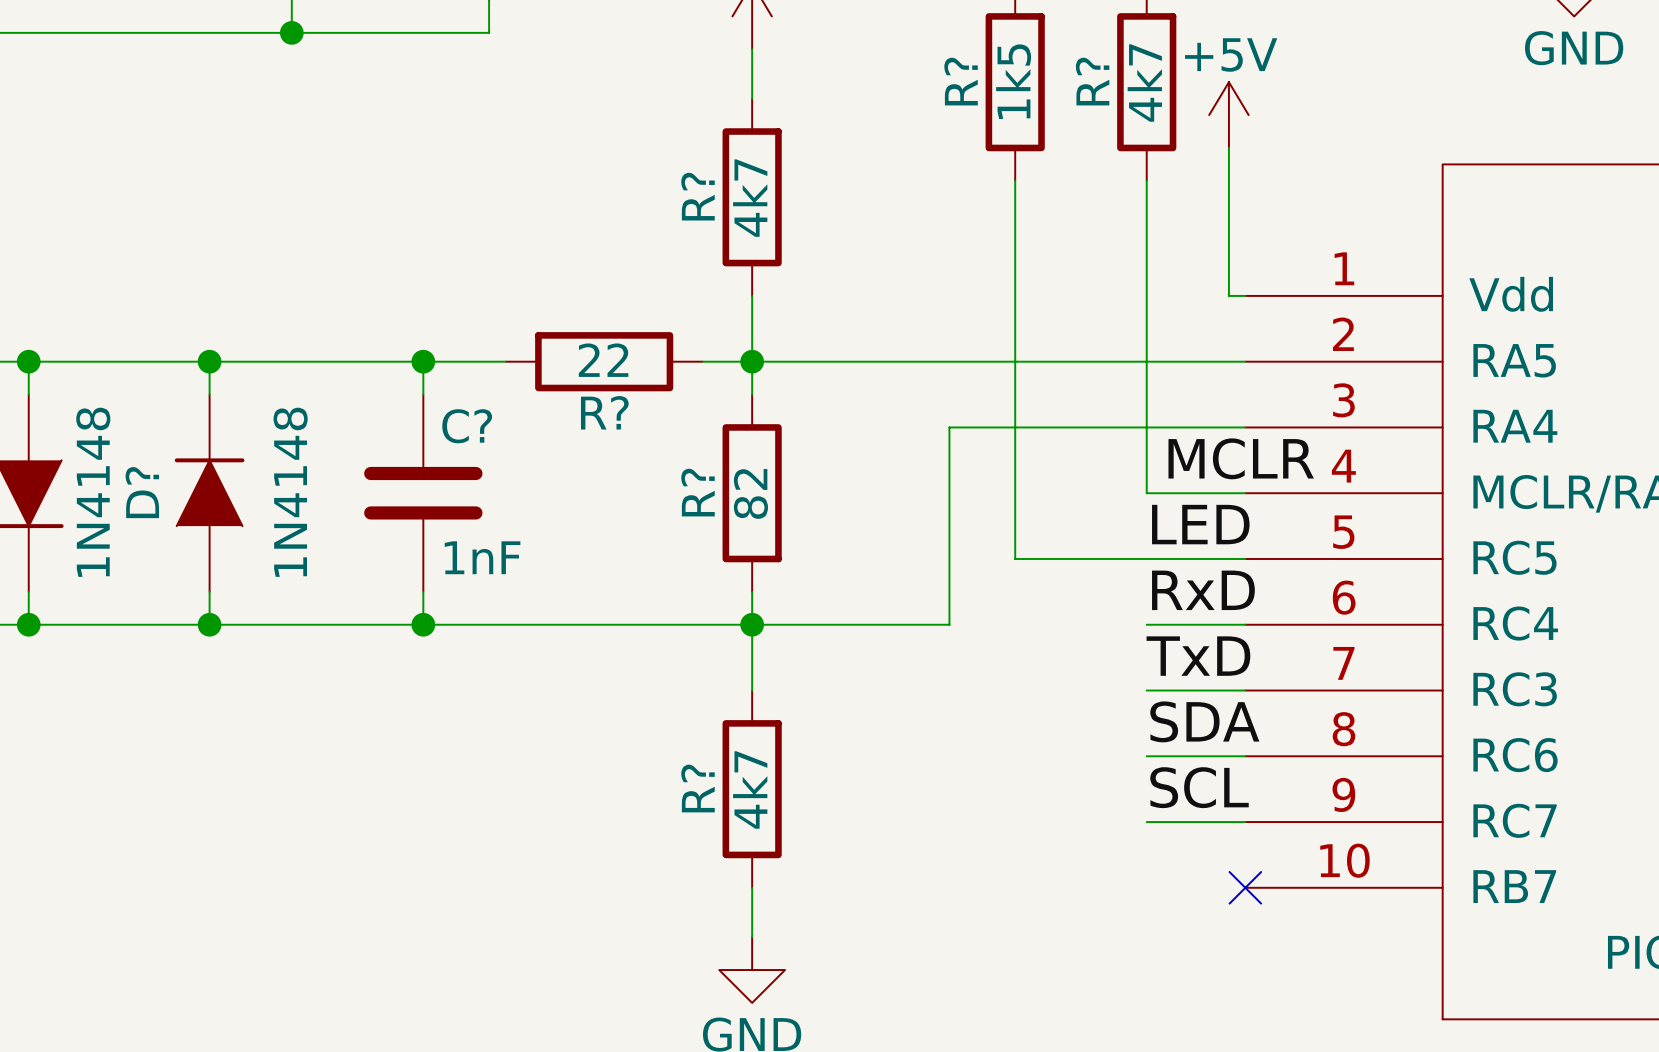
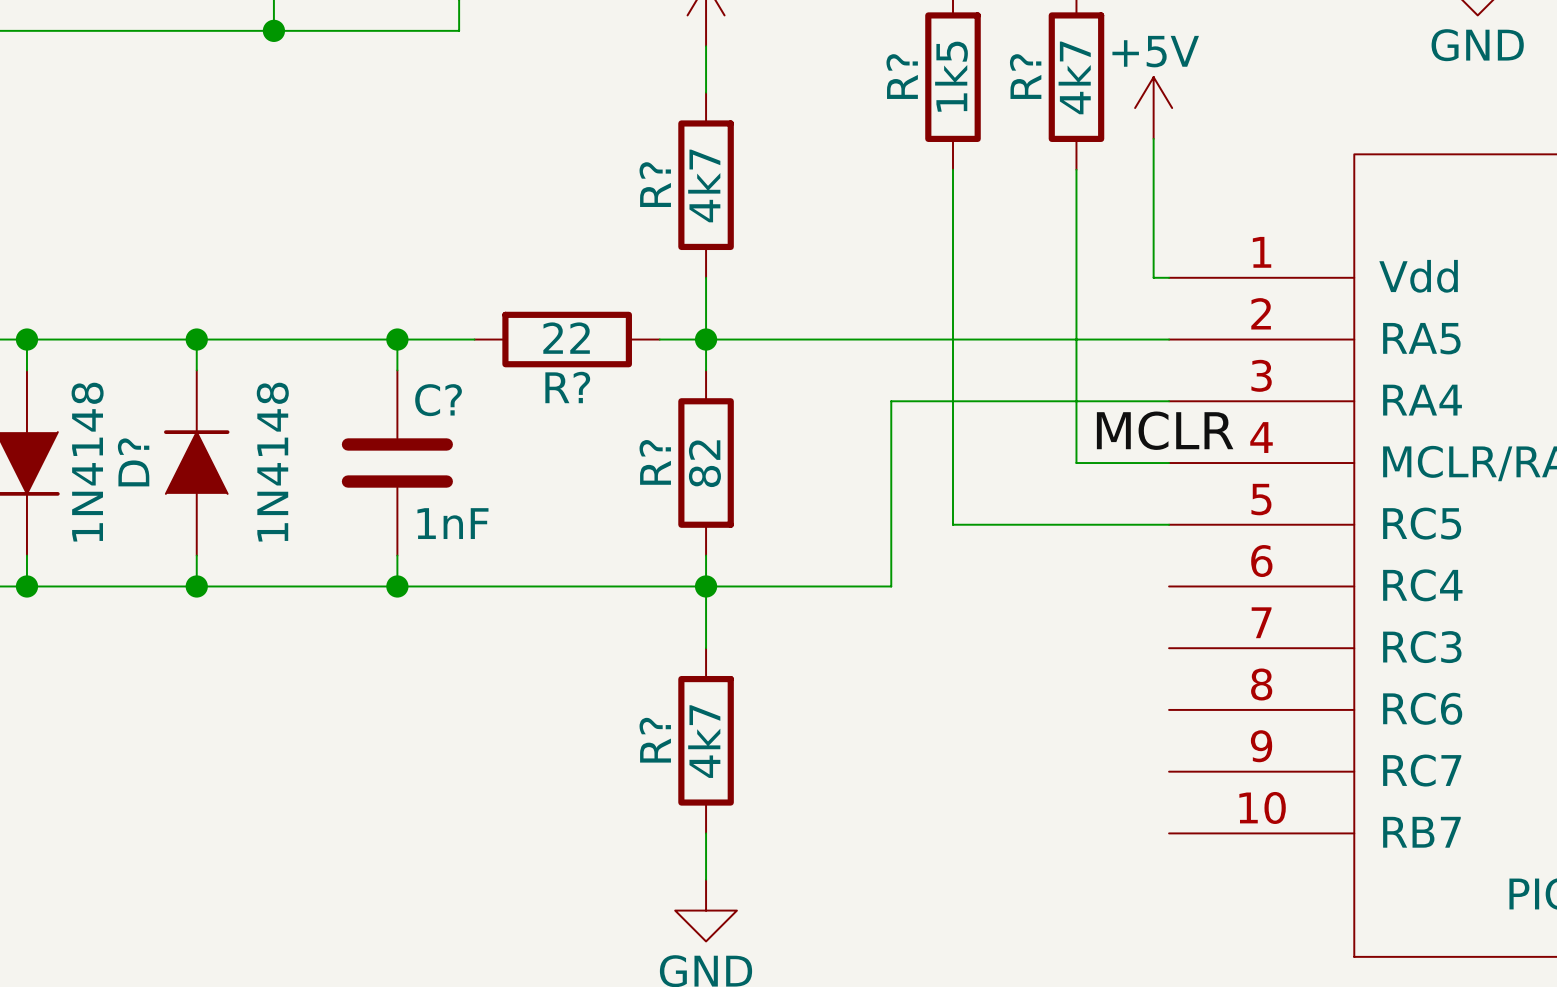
label: LED (1200, 524) -> none
label: RxD (1203, 590) -> none
wire: (1146, 624) (1245, 624) -> none
label: TxD (1198, 656) -> none
wire: (1146, 690) (1245, 690) -> none
label: SDA (1204, 721) -> none
wire: (1146, 756) (1245, 756) -> none
label: SCL (1199, 787) -> none
wire: (1146, 822) (1245, 822) -> none
no-connect mark: (1245, 887) -> none

